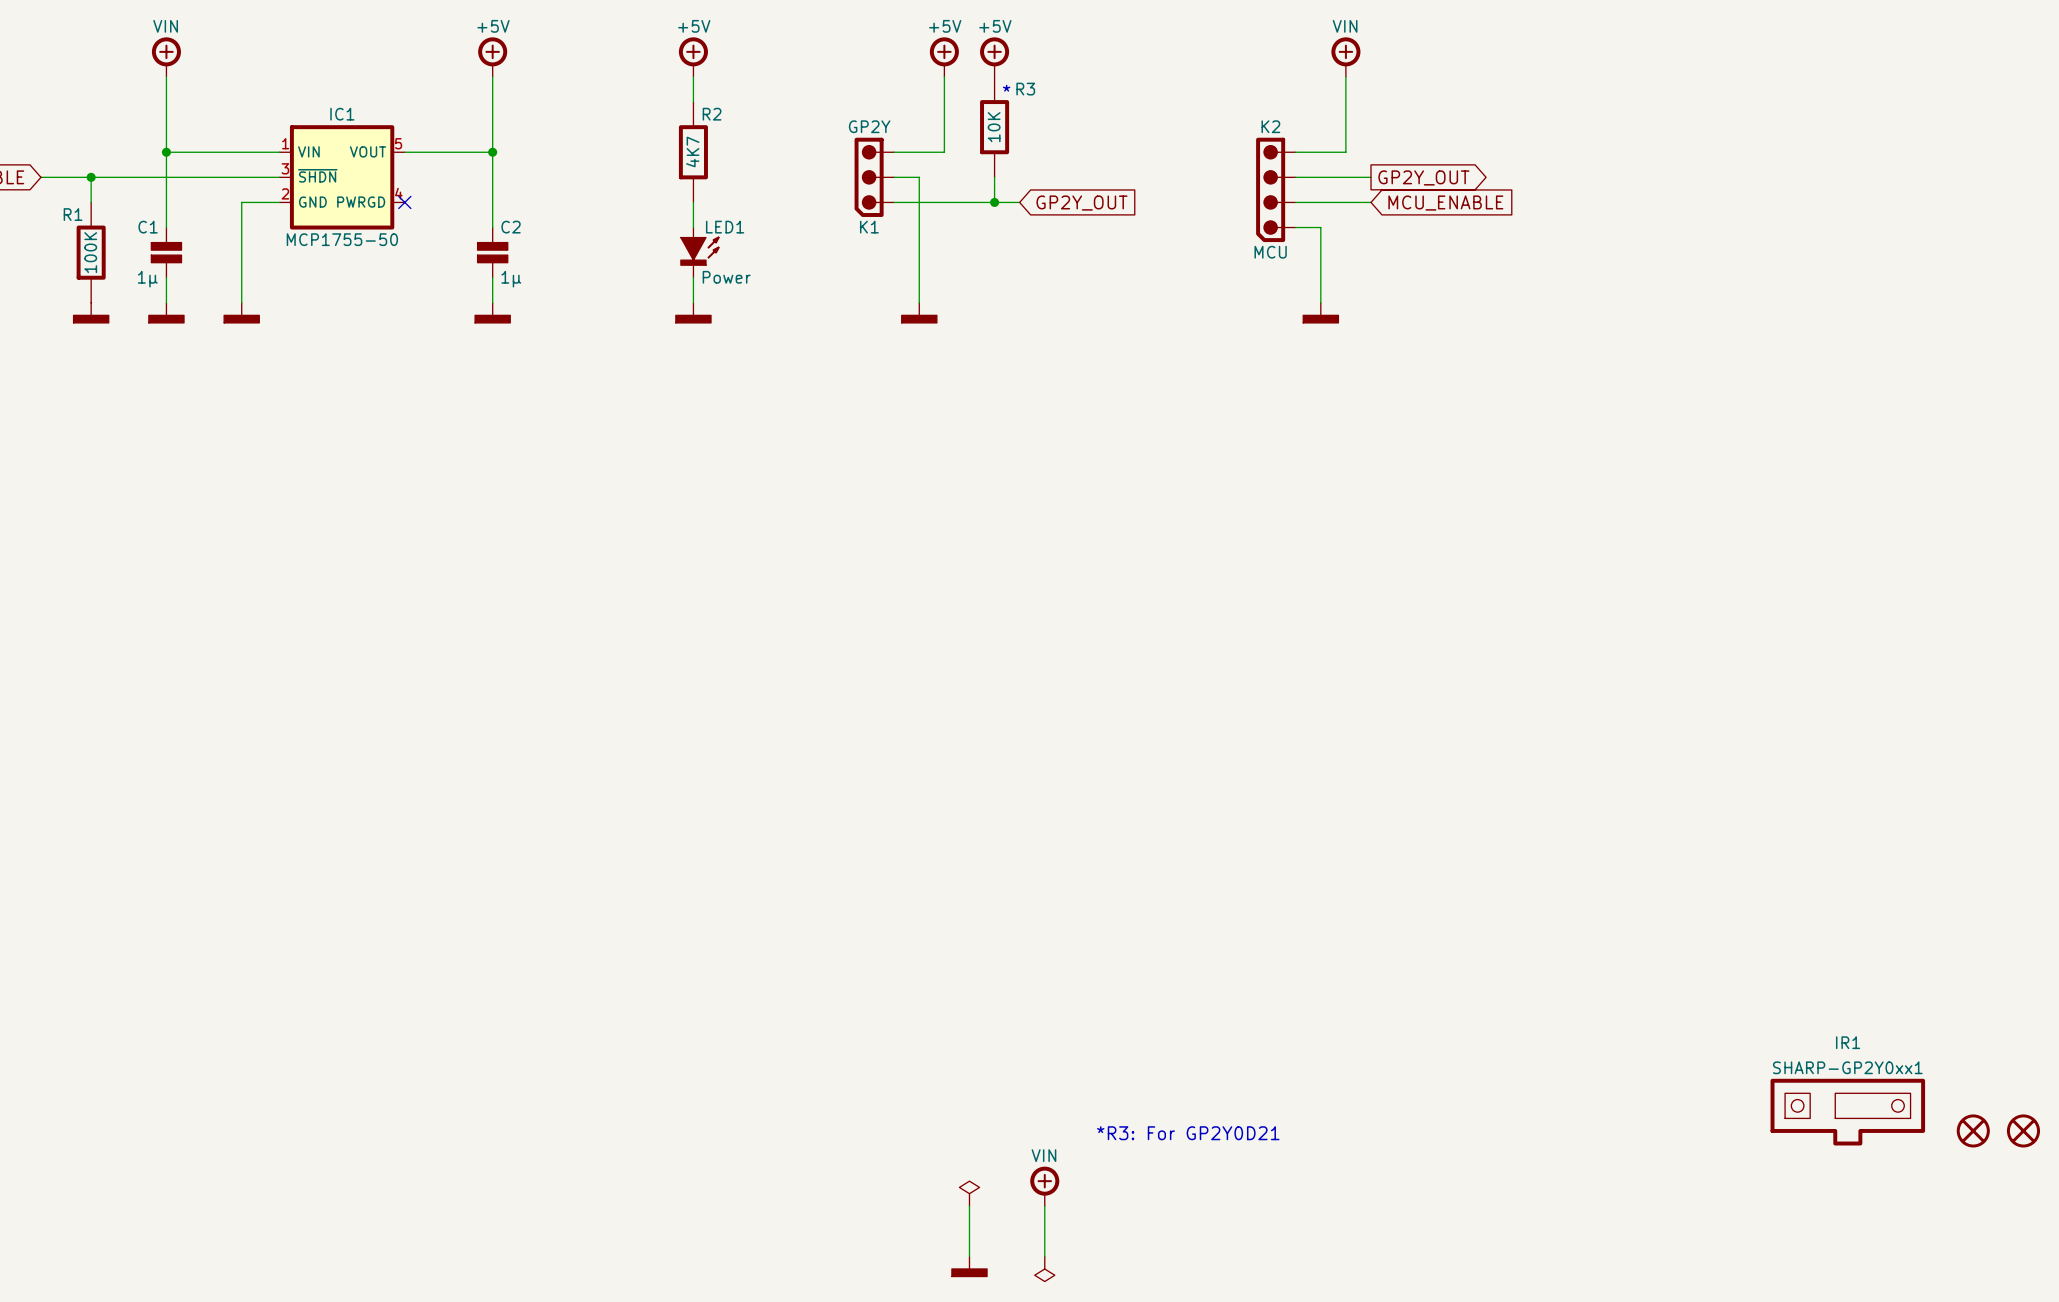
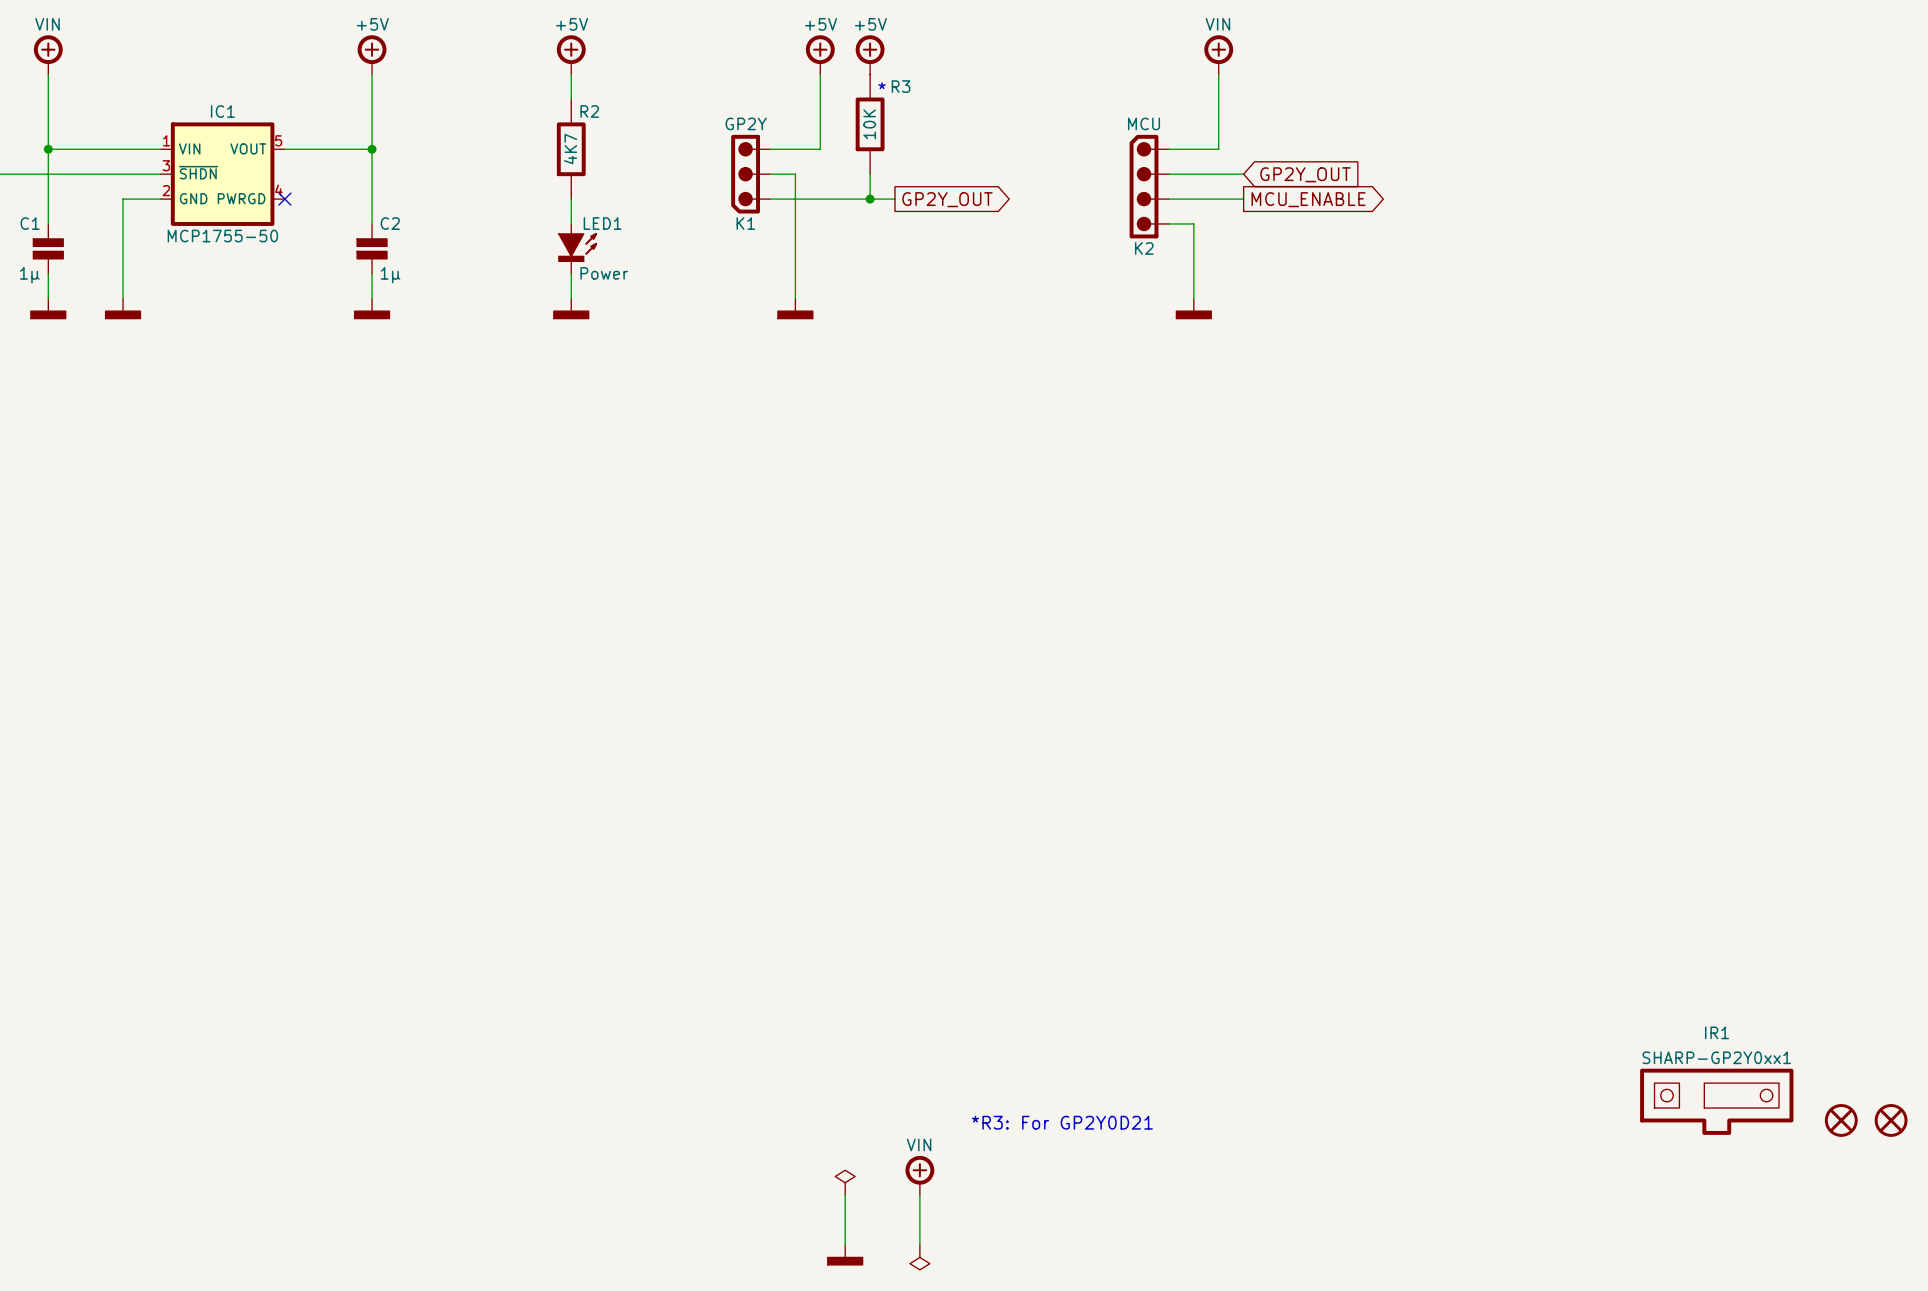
global label shape: output (1423, 177) -> input (1305, 174)
K2 flip: as is (1270, 189) -> up-down (1144, 186)
global label shape: input (1081, 203) -> output (947, 199)
global label shape: input (1445, 203) -> output (1308, 199)

